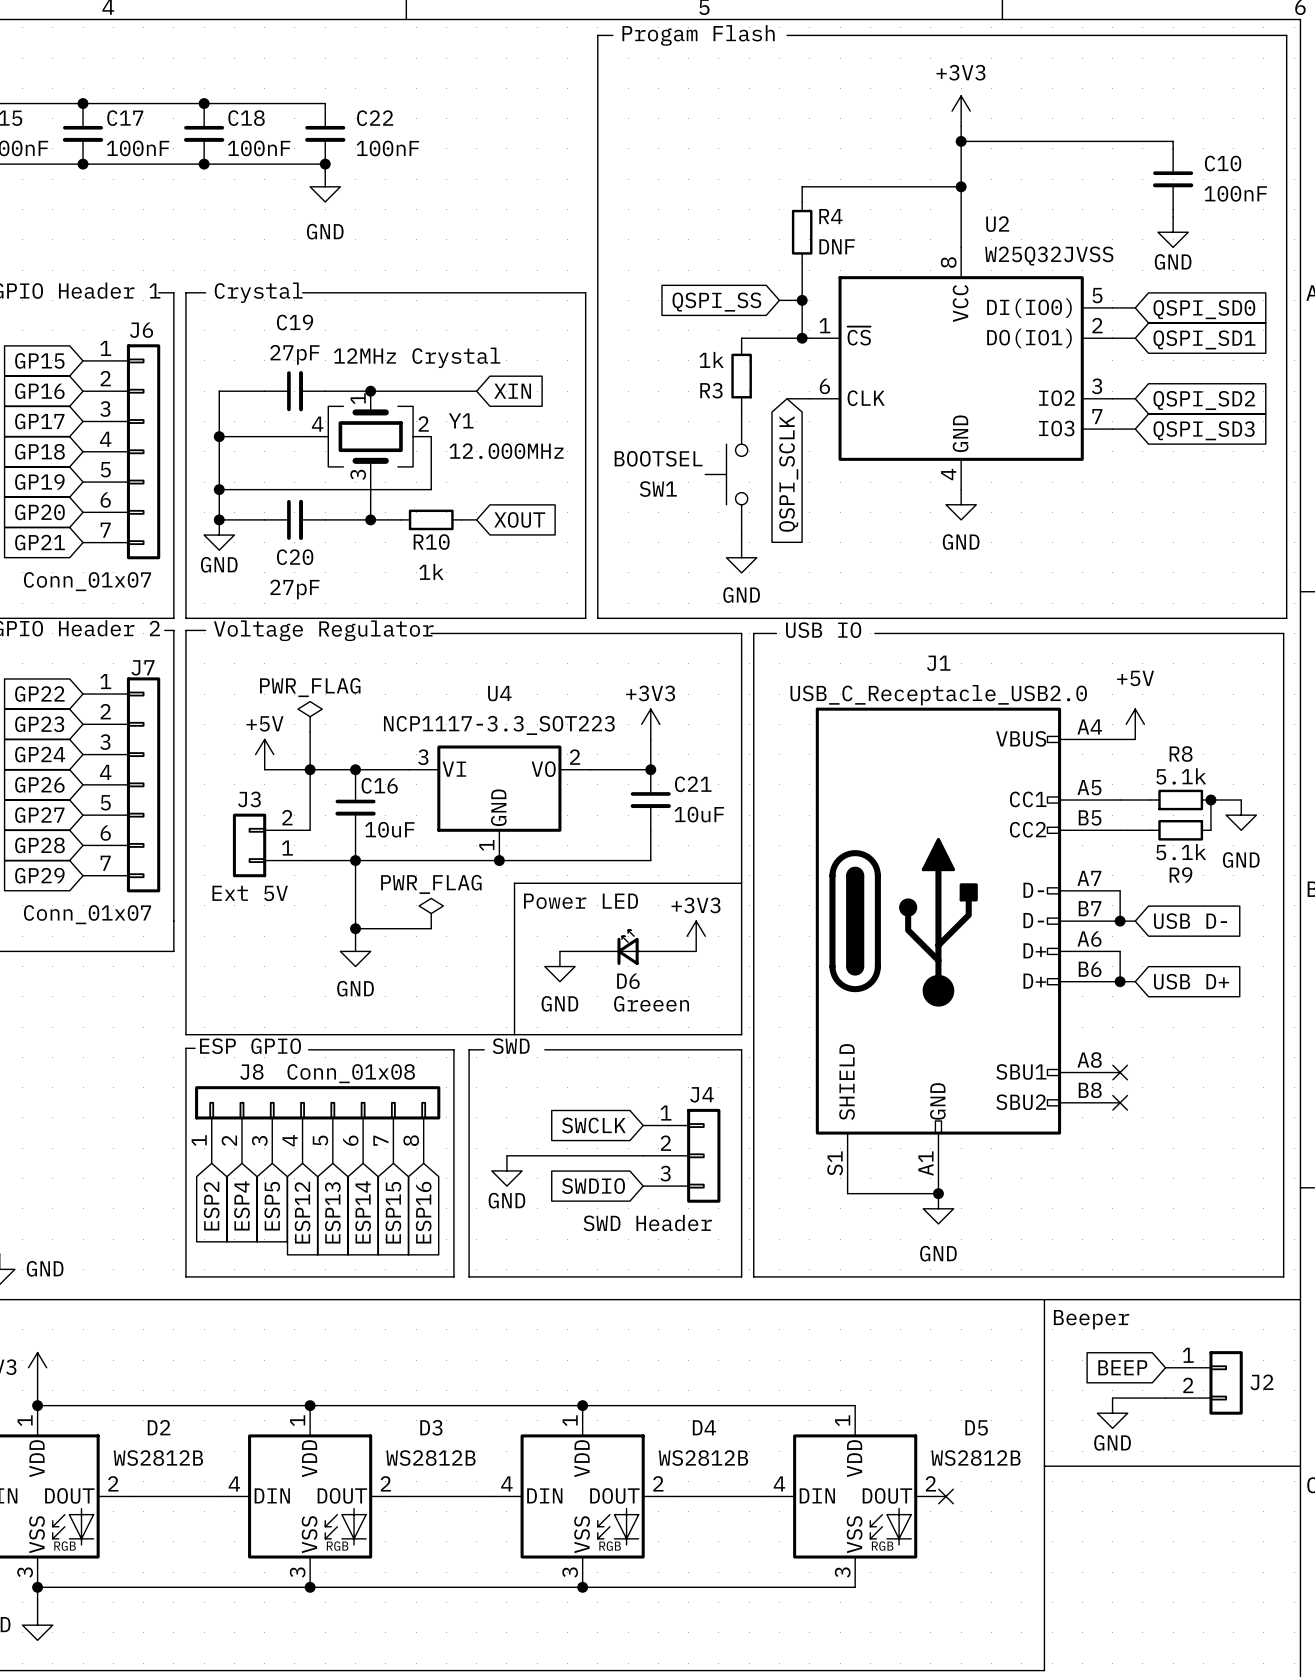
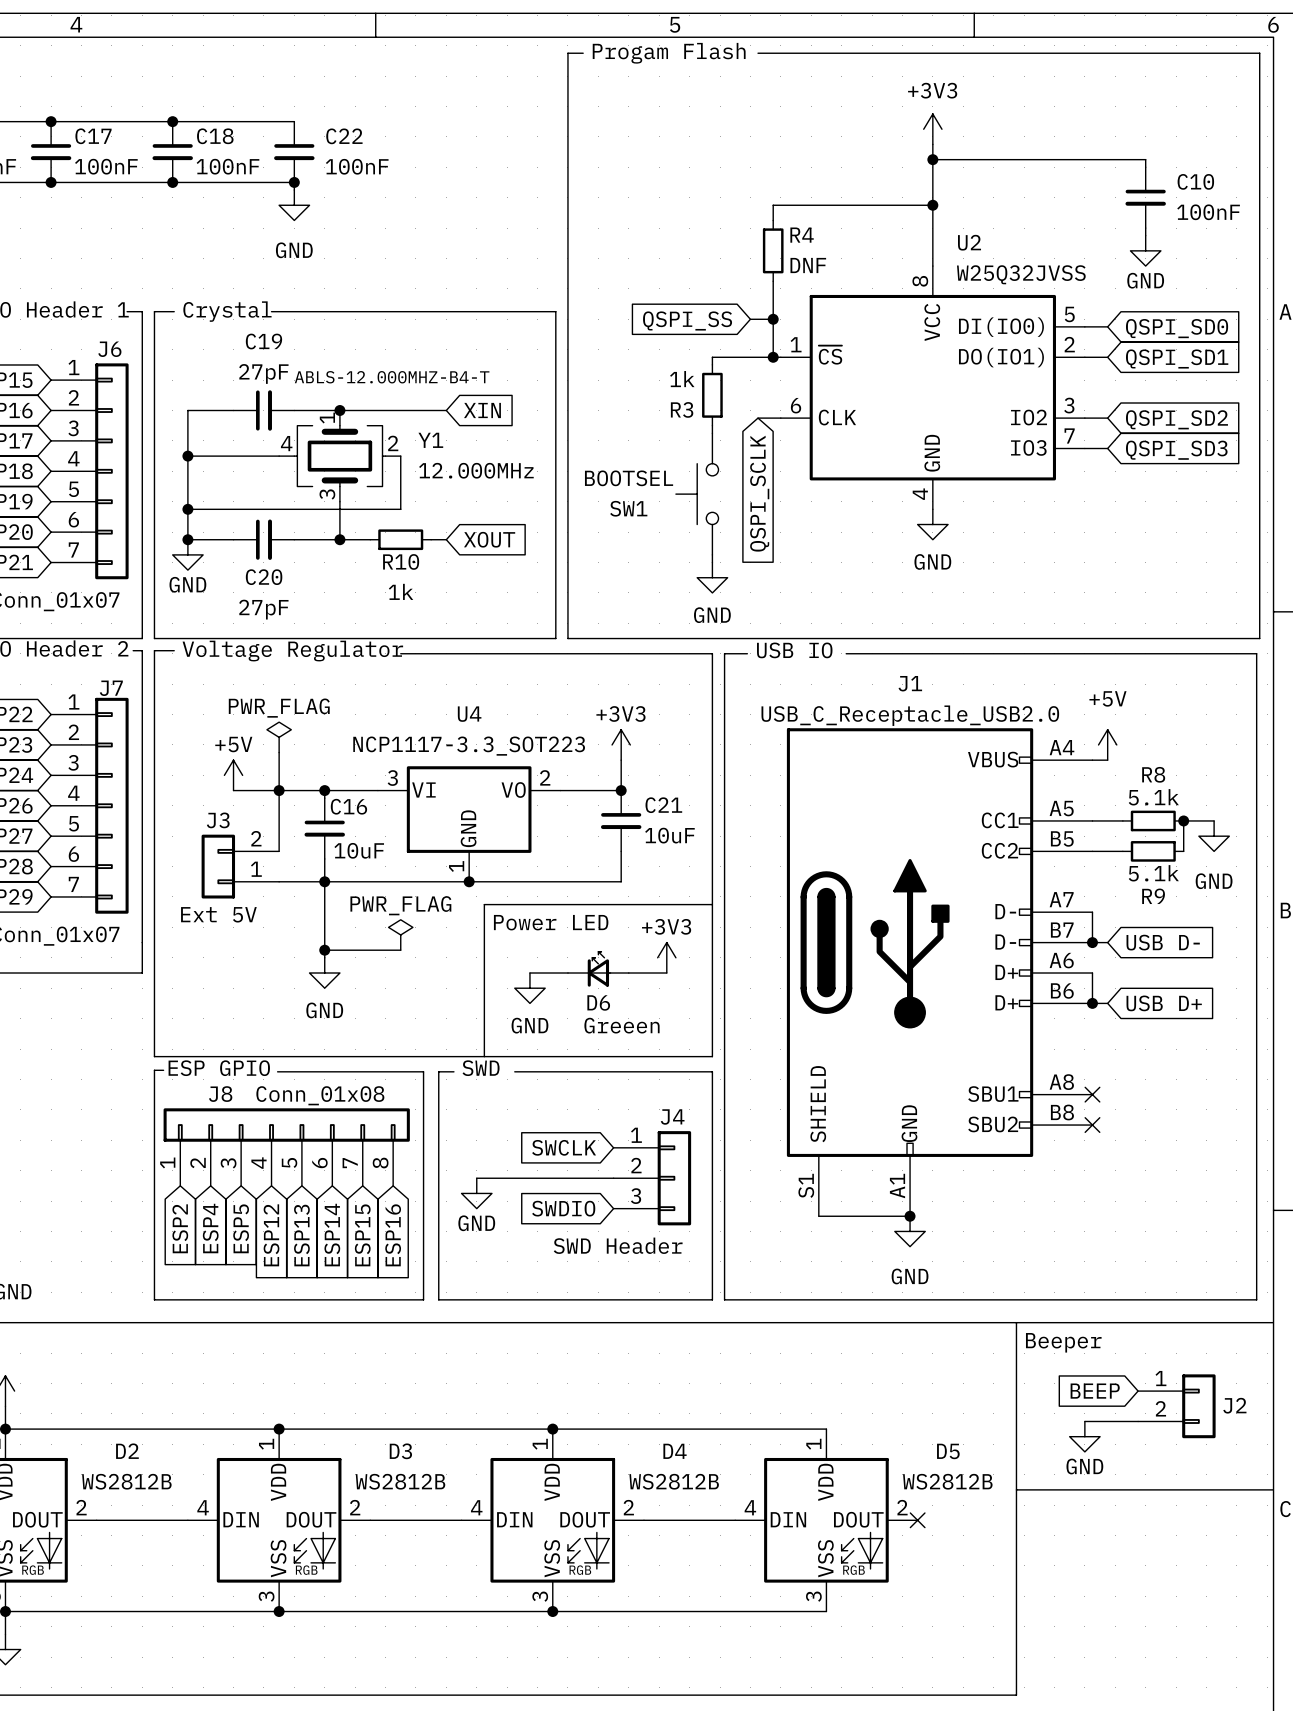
text: 12MHz Crystal (417, 357) -> ABLS-12.000MHZ-B4-T (392, 377)

